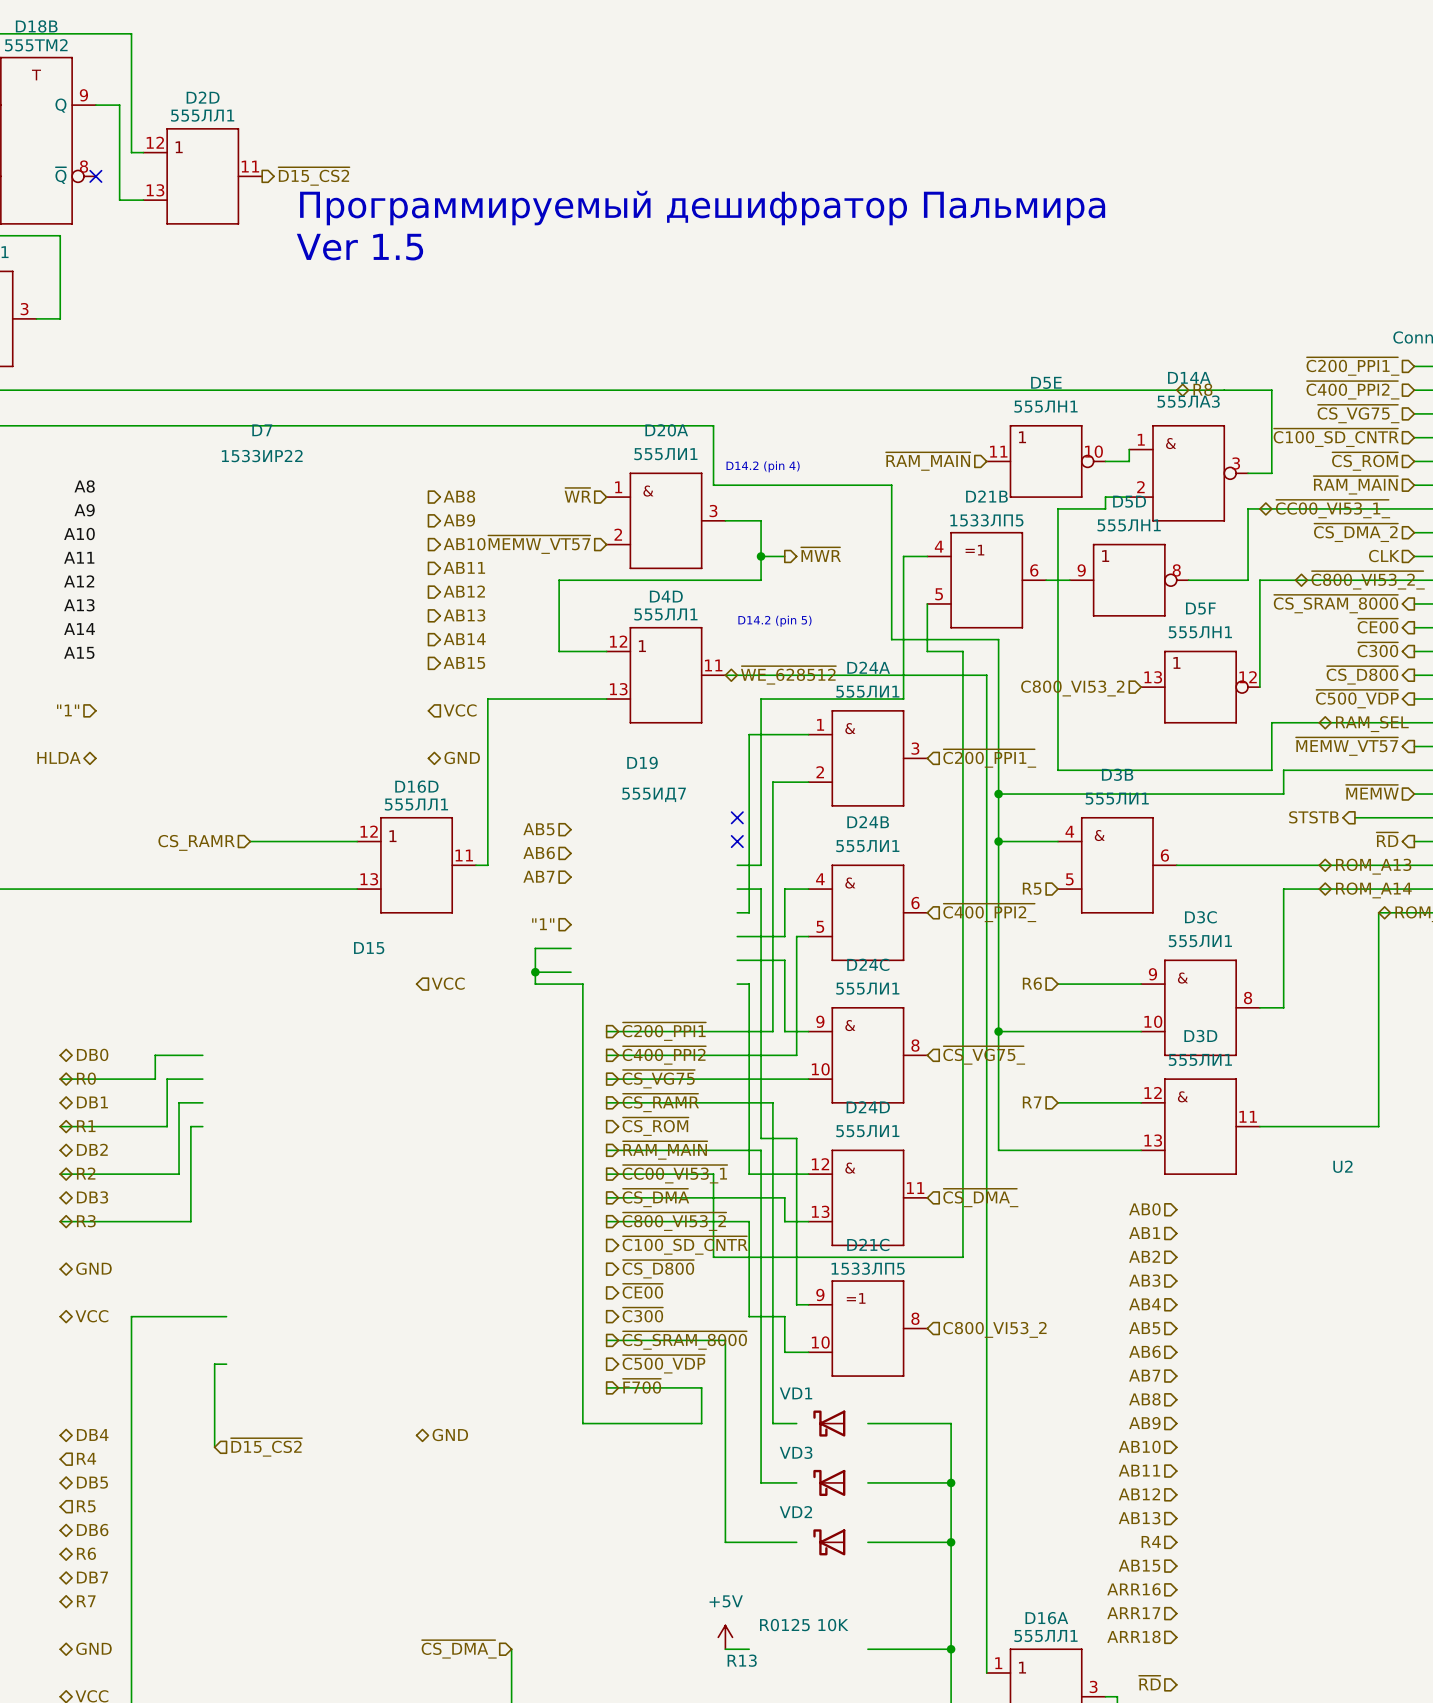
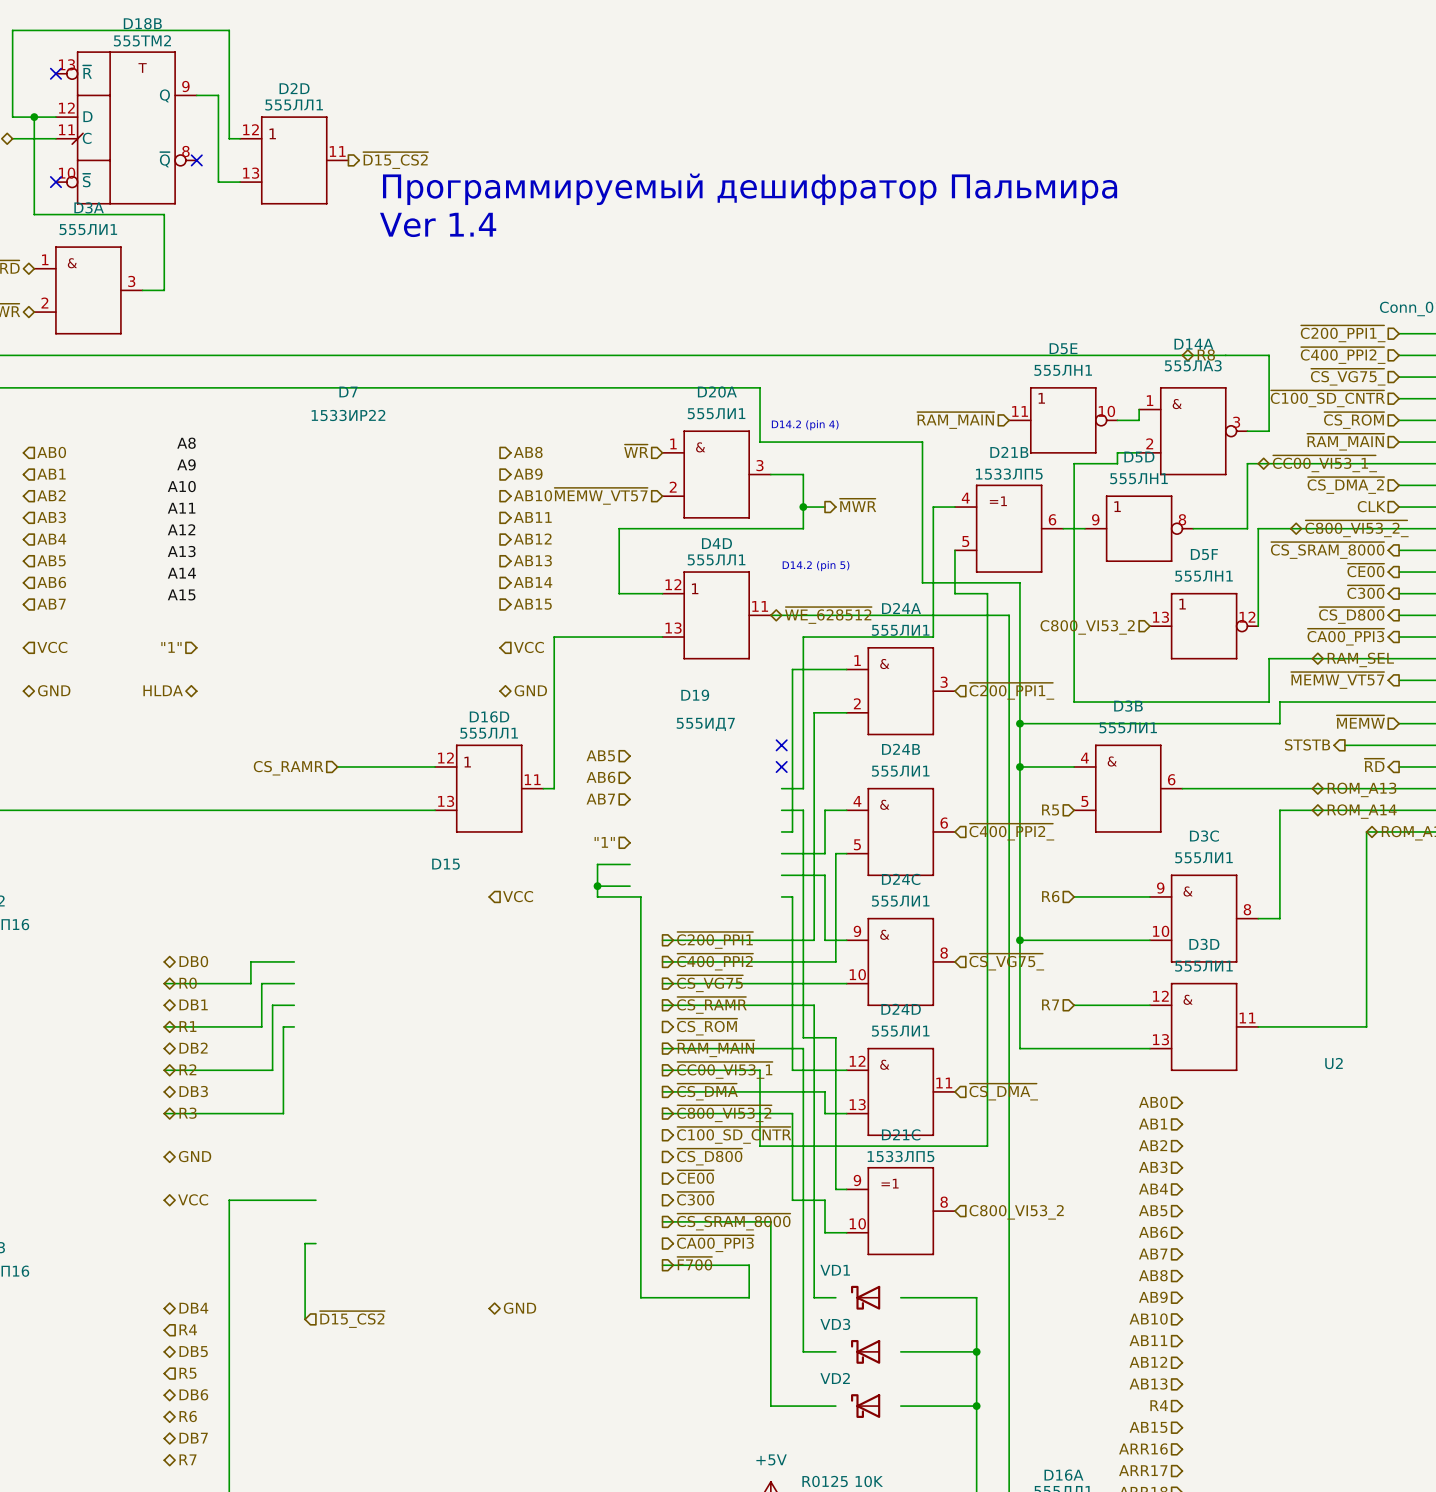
text: Ver 1.5 (359, 247) -> Ver 1.4 (438, 224)
hierarchical label: ~{C500_VDP} (1357, 699) -> ~{CA00_PPI3} (1345, 637)
hierarchical label: ~{C500_VDP} (663, 1364) -> ~{CA00_PPI3} (715, 1243)

